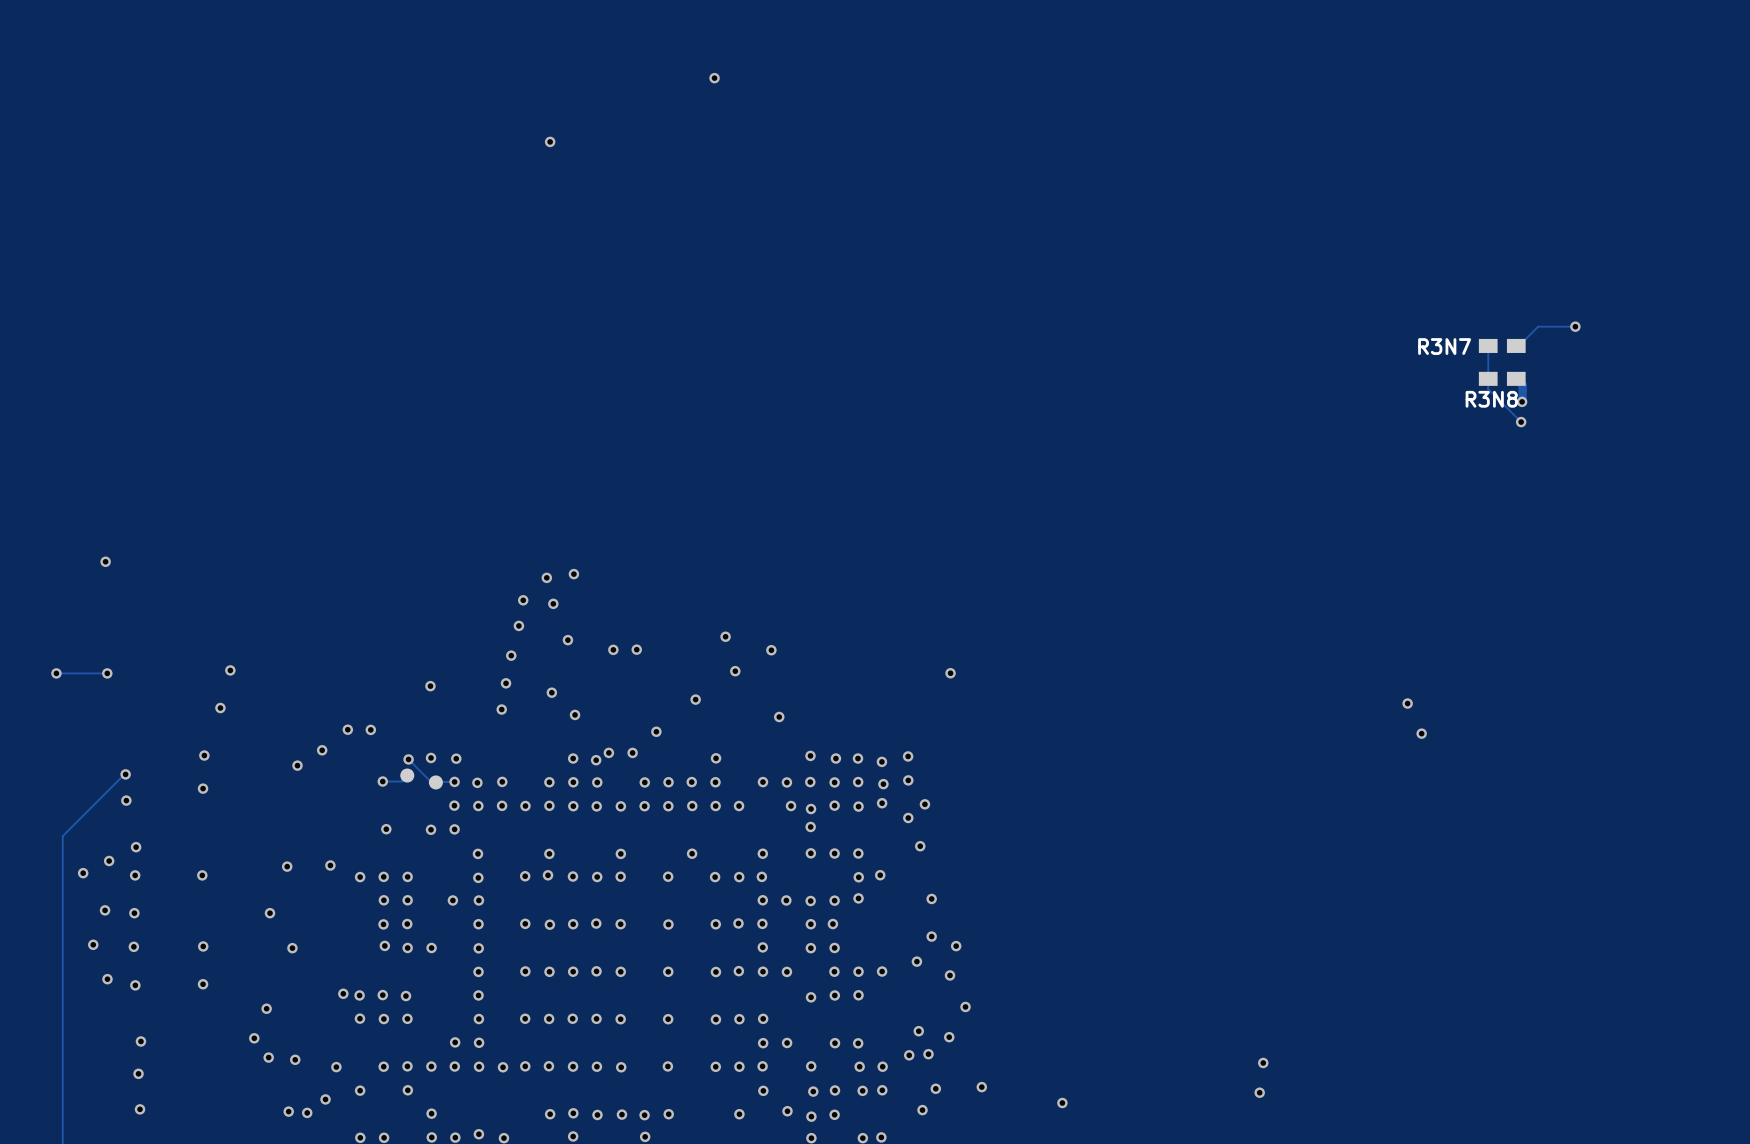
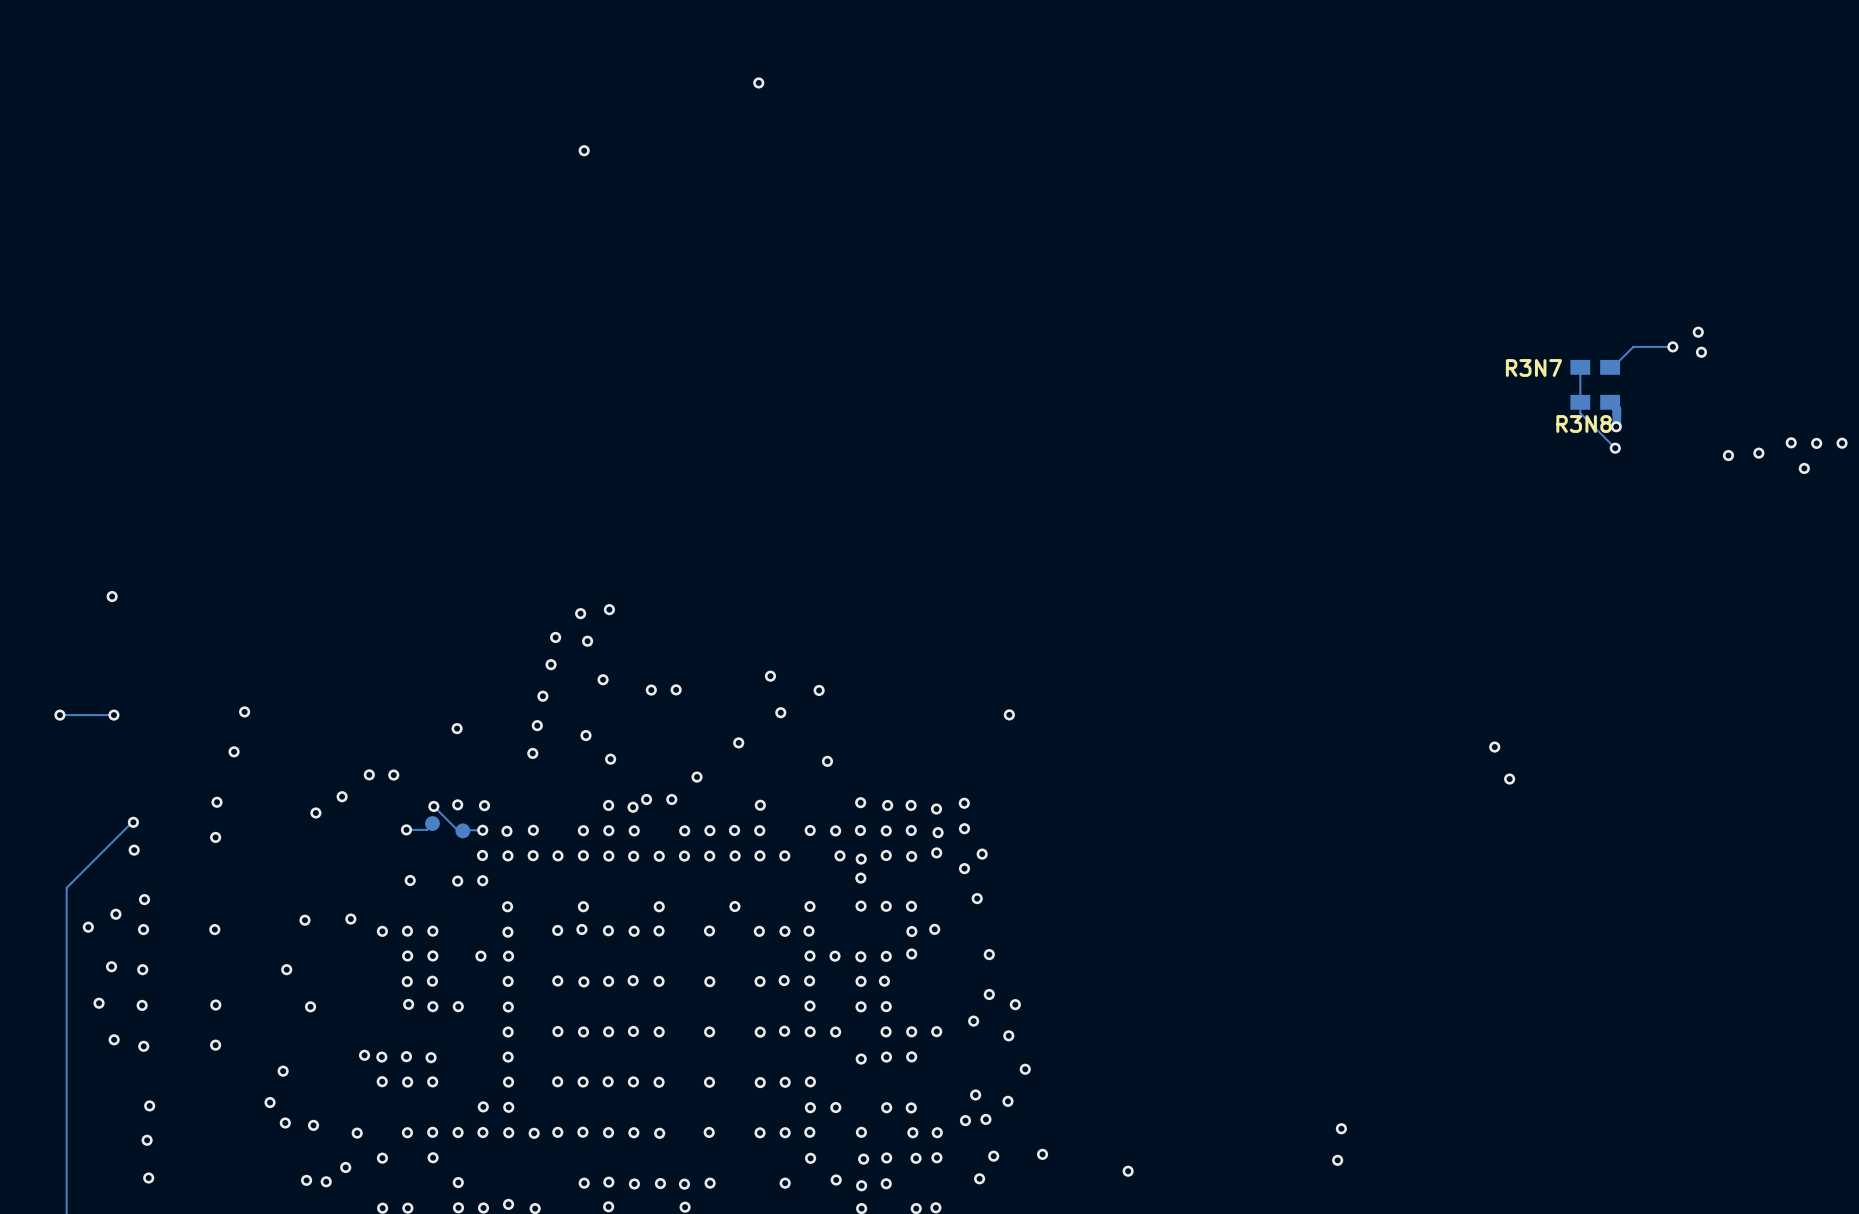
via: none -> (1698, 332)
via: none -> (1701, 352)
via: none -> (1791, 442)
via: none -> (1816, 443)
via: none -> (1842, 443)
via: none -> (1758, 453)
via: none -> (1728, 455)
via: none -> (1804, 468)

